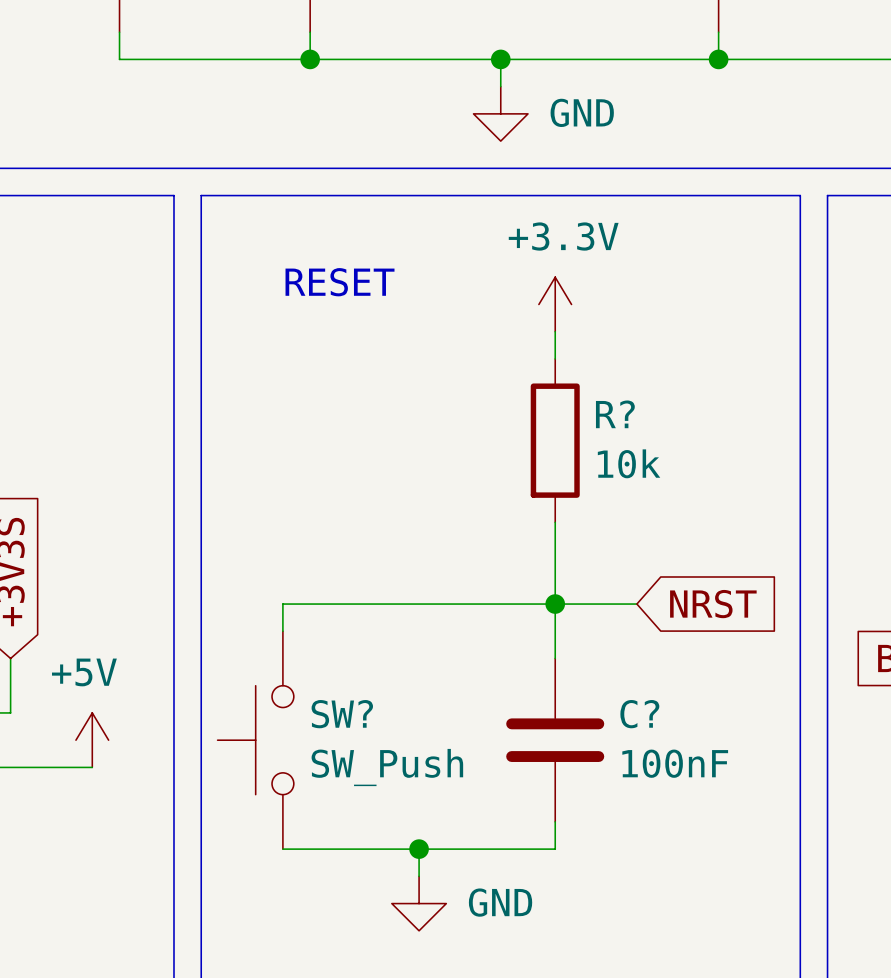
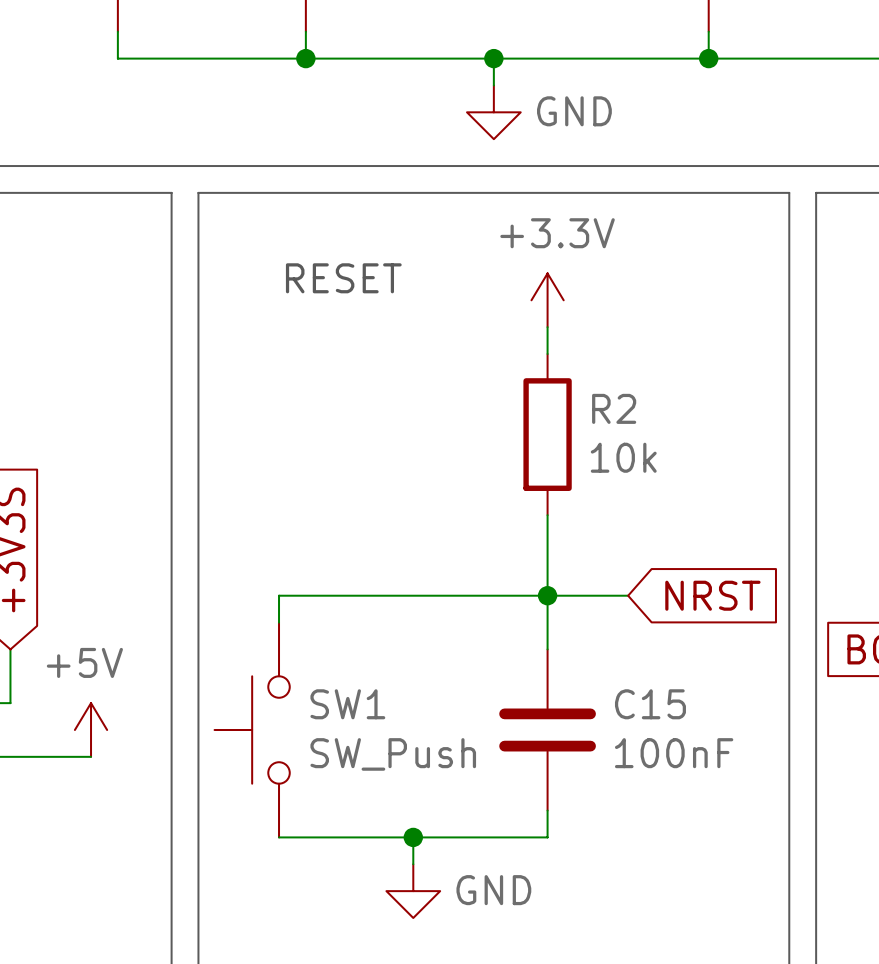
R? name: R? (615, 414) -> R2 (614, 408)
SW? name: SW? (342, 714) -> SW1 (347, 704)
C? name: C? (639, 714) -> C15 (650, 704)

